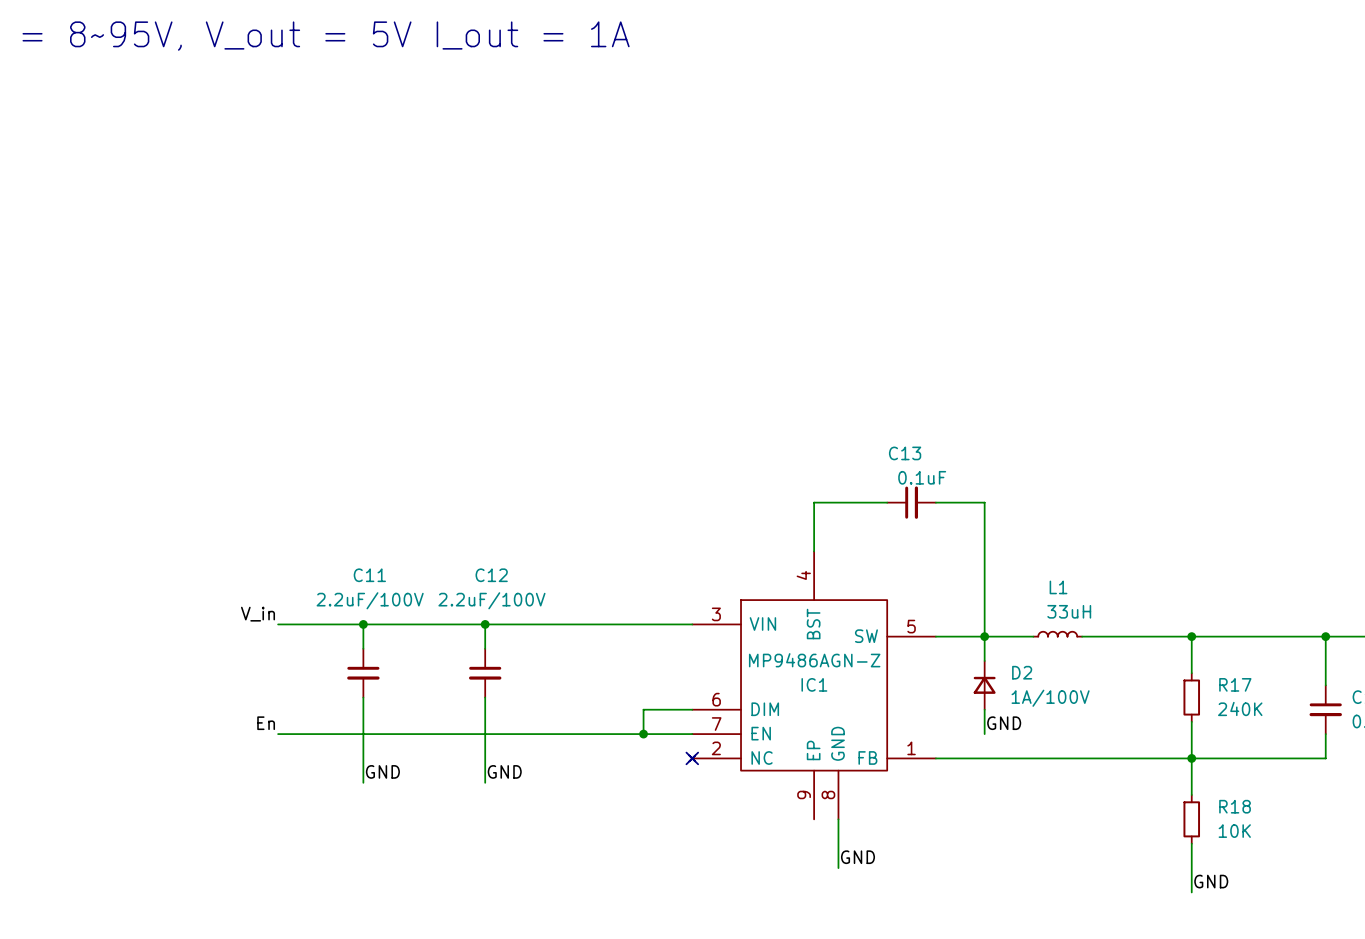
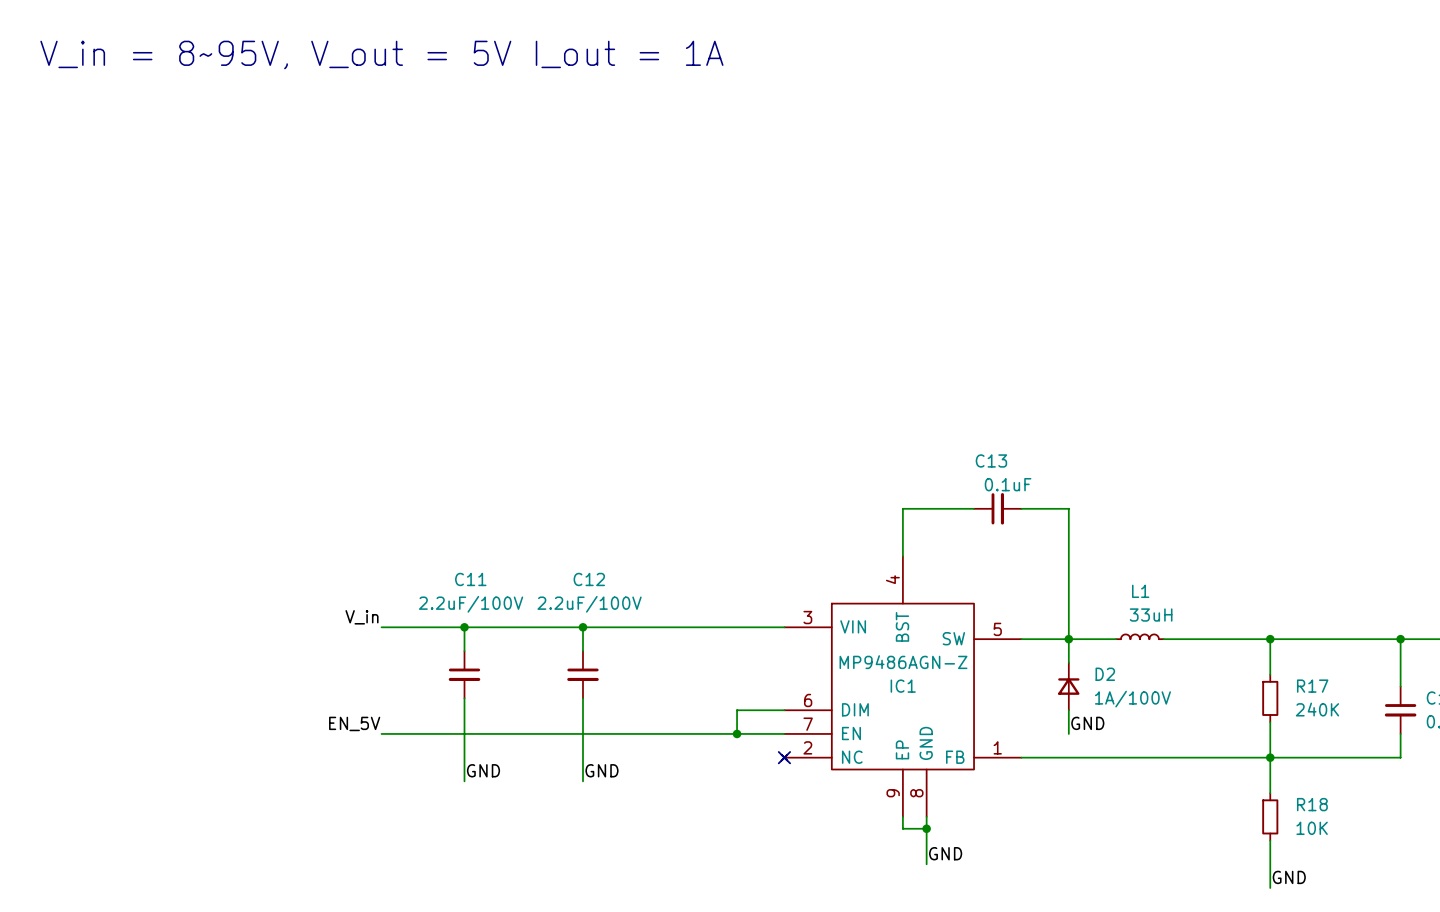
label: En (266, 723) -> EN_5V (354, 723)
wire: none -> (902, 816) (902, 828) (926, 828)
junction: none -> (926, 828)

